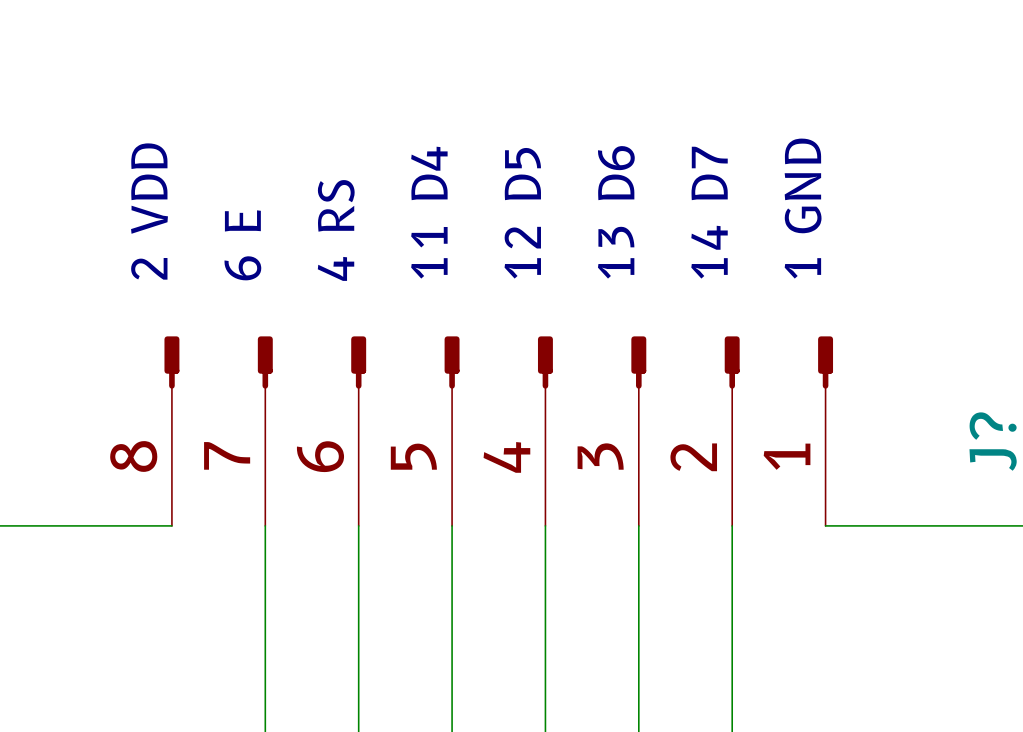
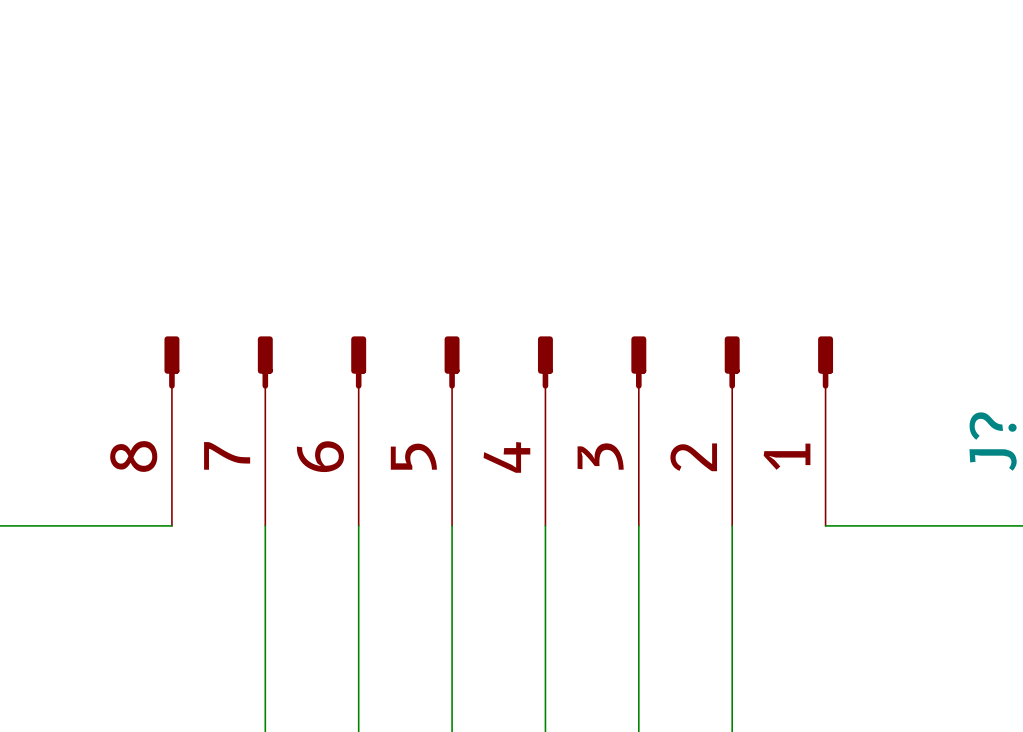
text: 1 GND (803, 208) -> none
text: 2 VDD (149, 211) -> none
text: 11 D4 (429, 212) -> none
text: 13 D6 (616, 212) -> none
text: 14 D7 (709, 212) -> none
text: 12 D5 (522, 213) -> none
text: 4 RS (336, 230) -> none
text: 6 E (242, 245) -> none

